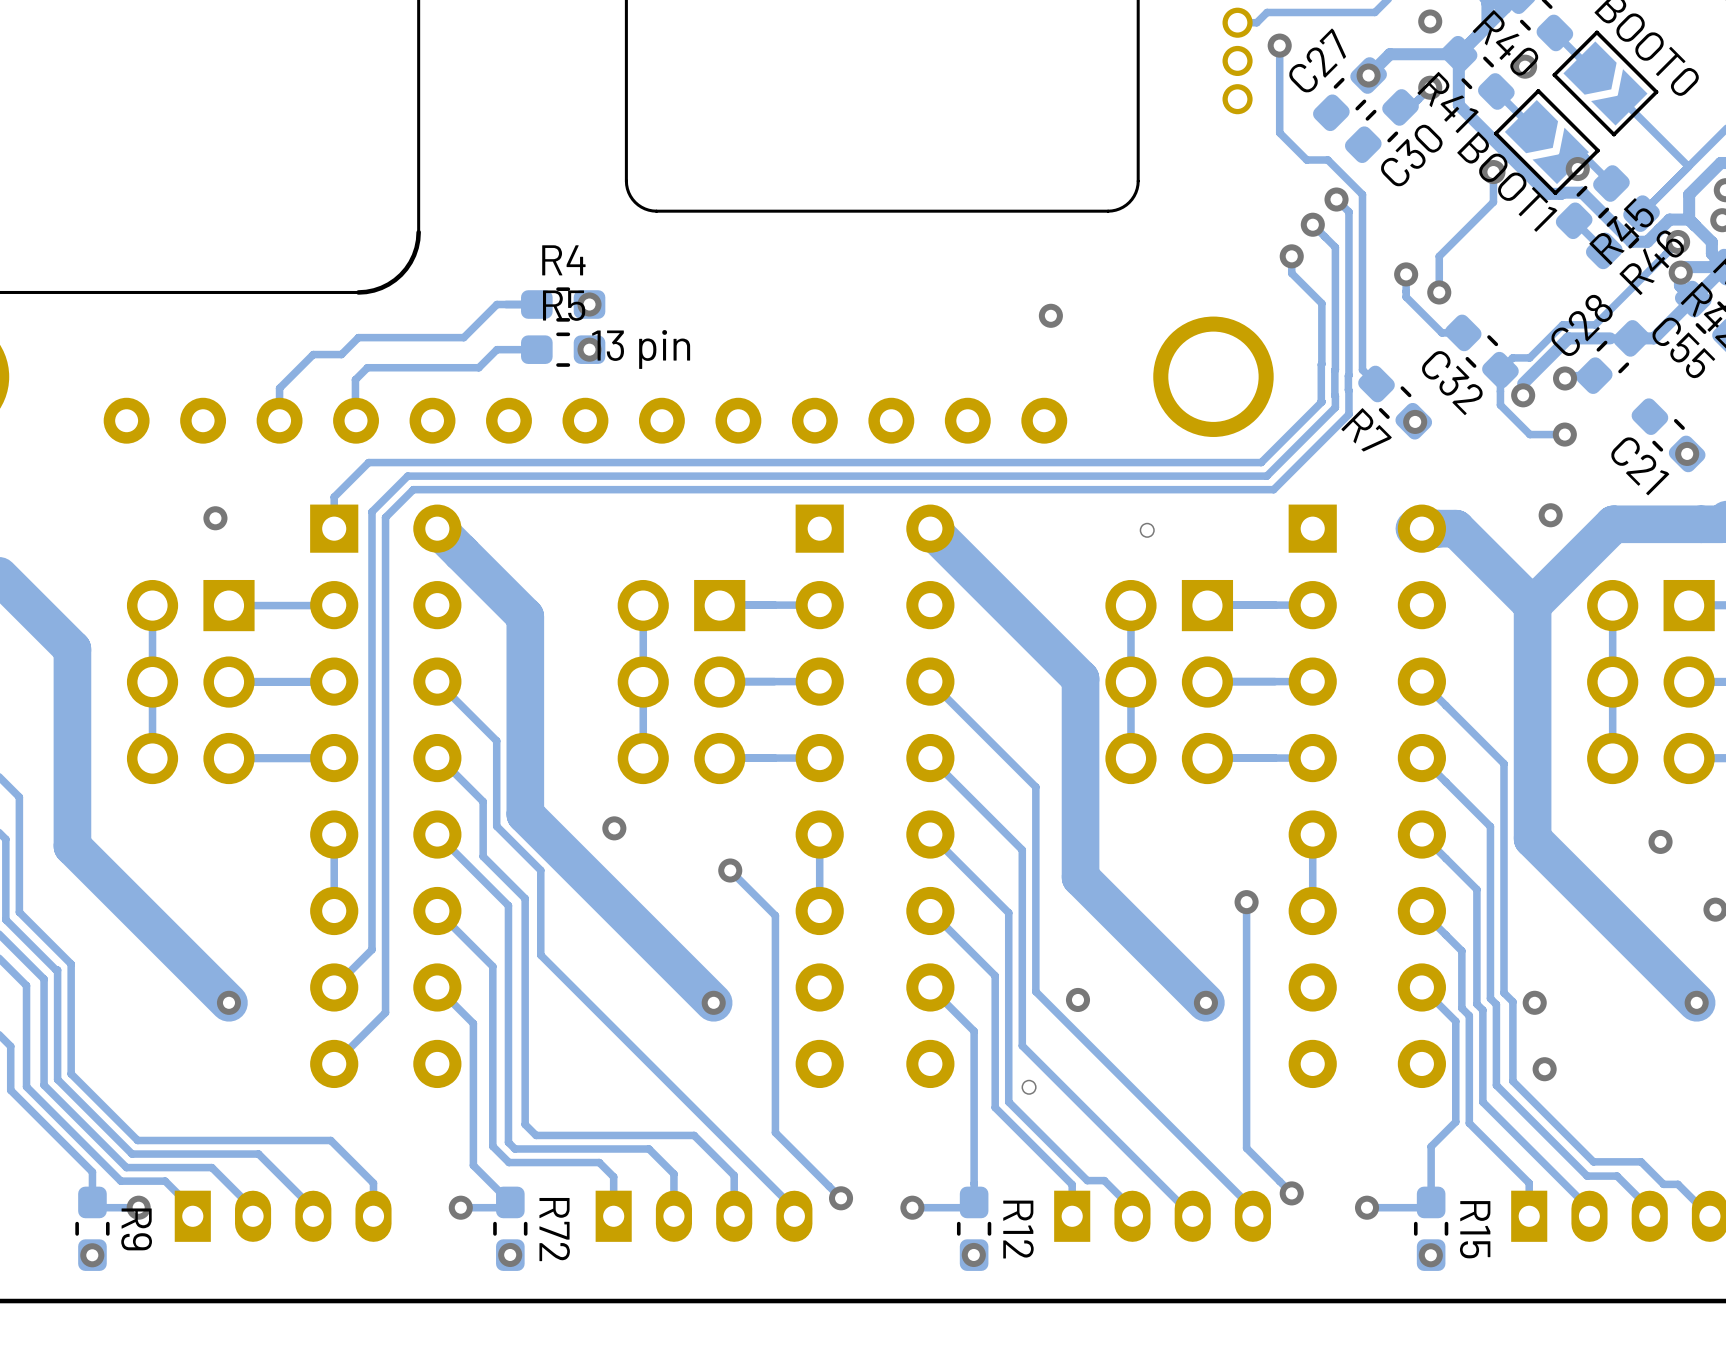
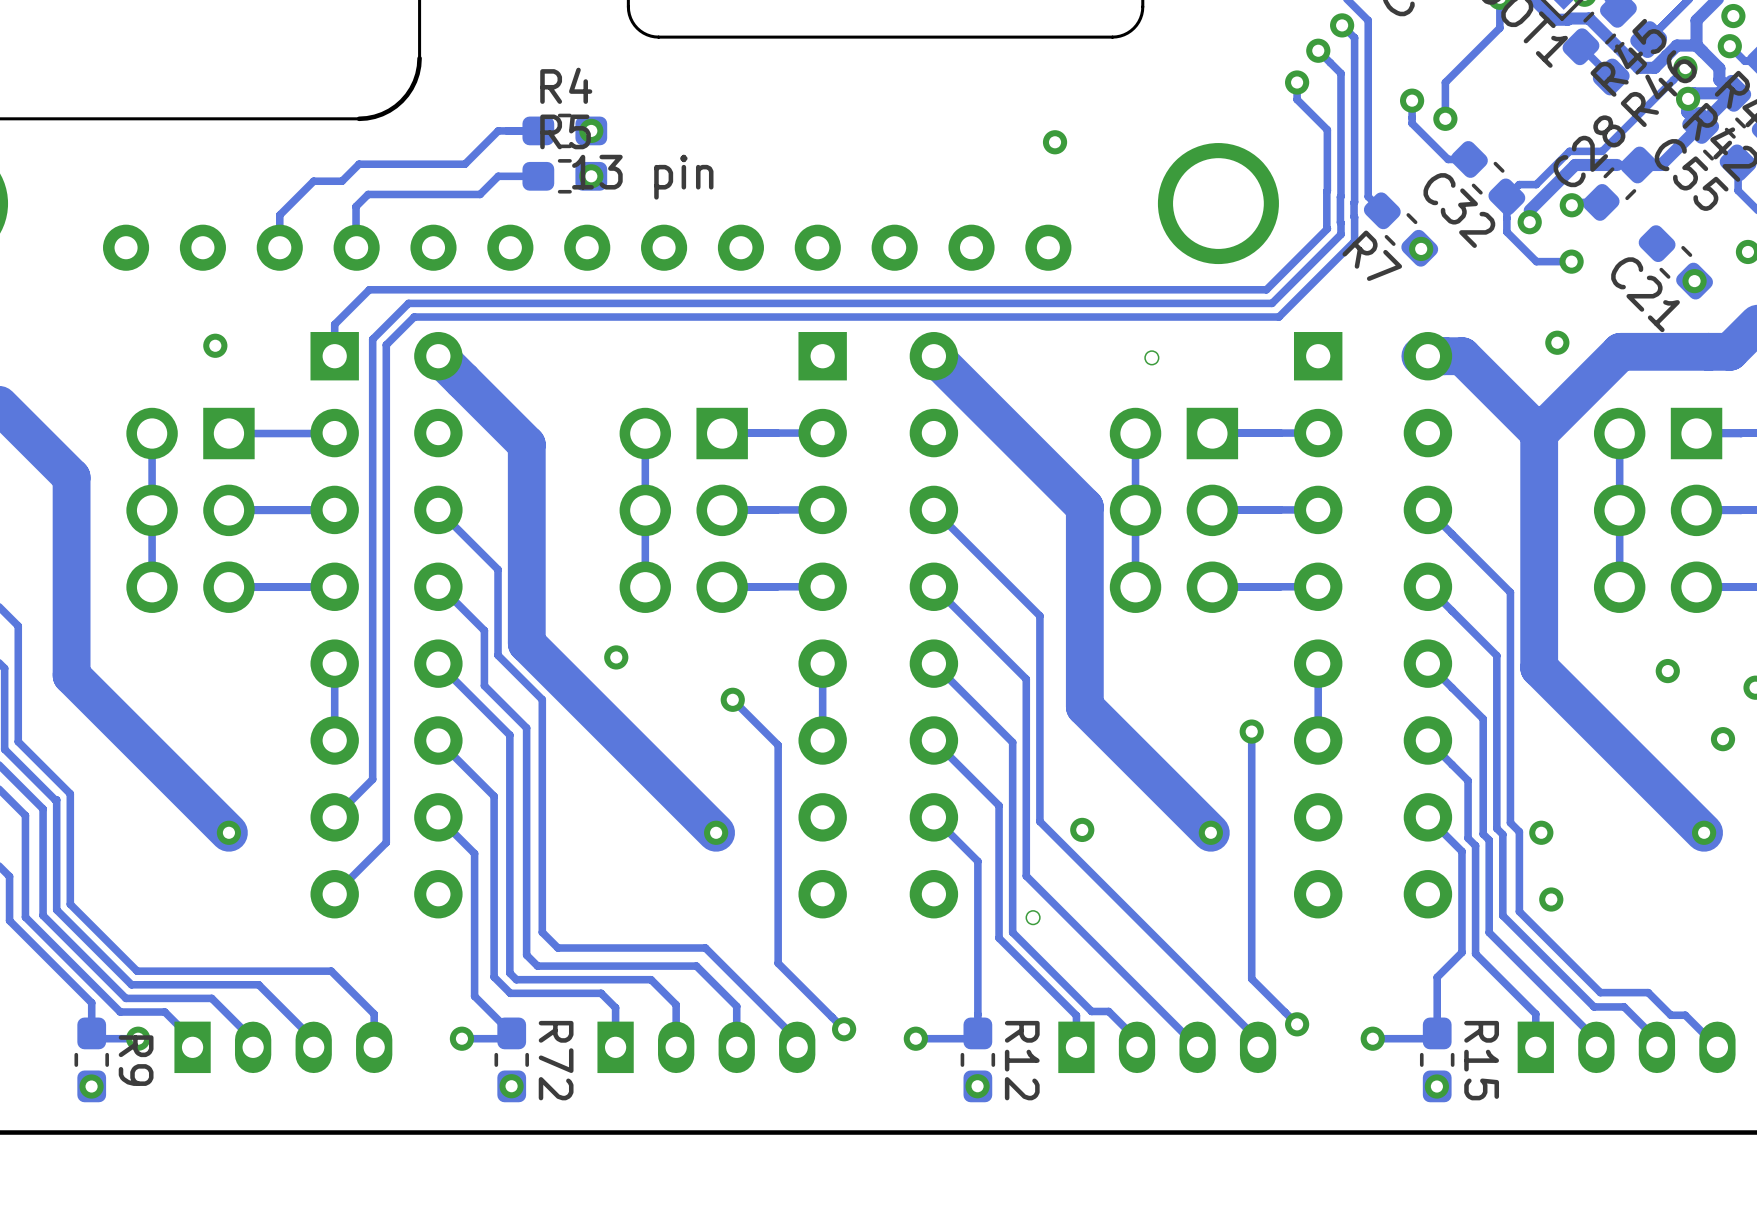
track: (540, 955) (703, 1117) -> (542, 784) (542, 932) (557, 948) (705, 948)

